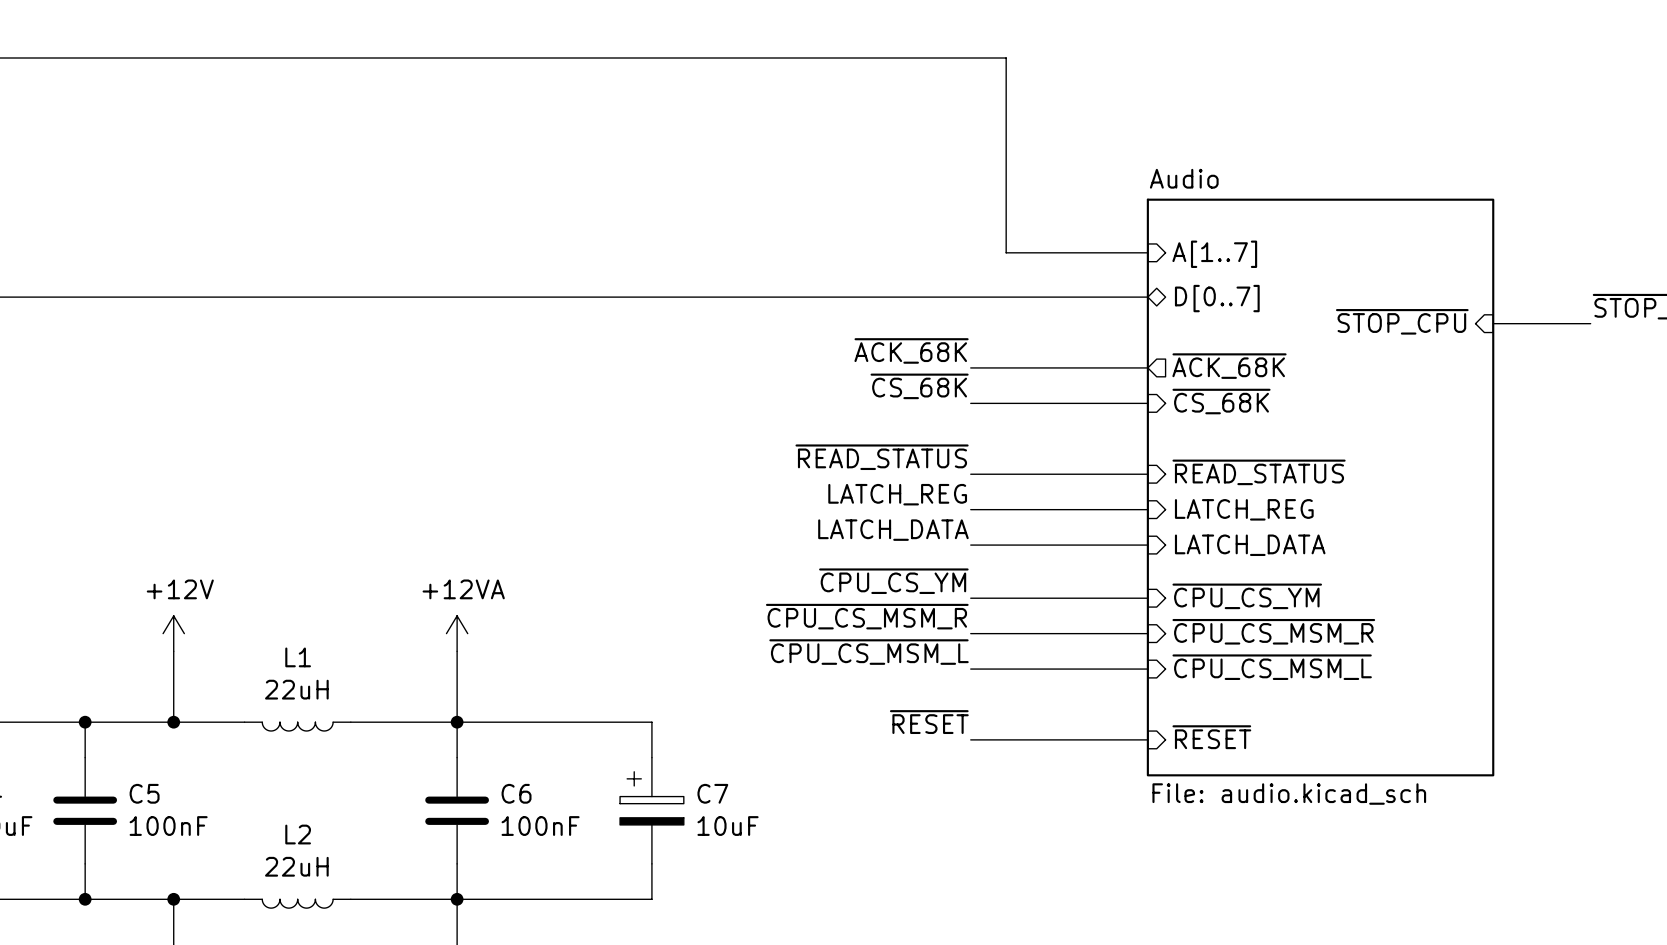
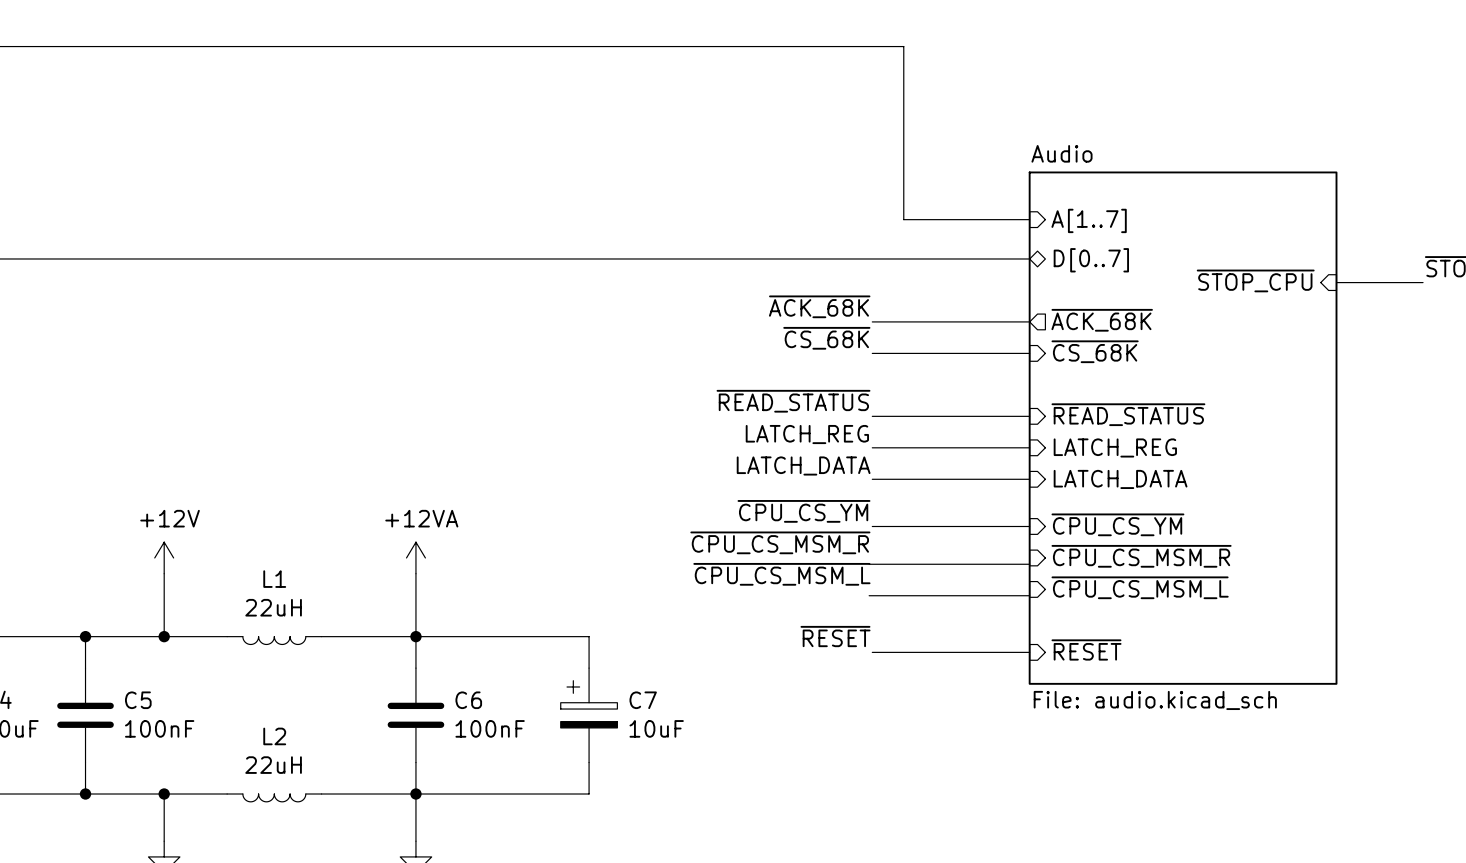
wire: (970, 633) (1147, 633) -> none
wire: none -> (869, 564) (1029, 564)
wire: (970, 669) (1147, 669) -> none
wire: none -> (869, 595) (1029, 595)

